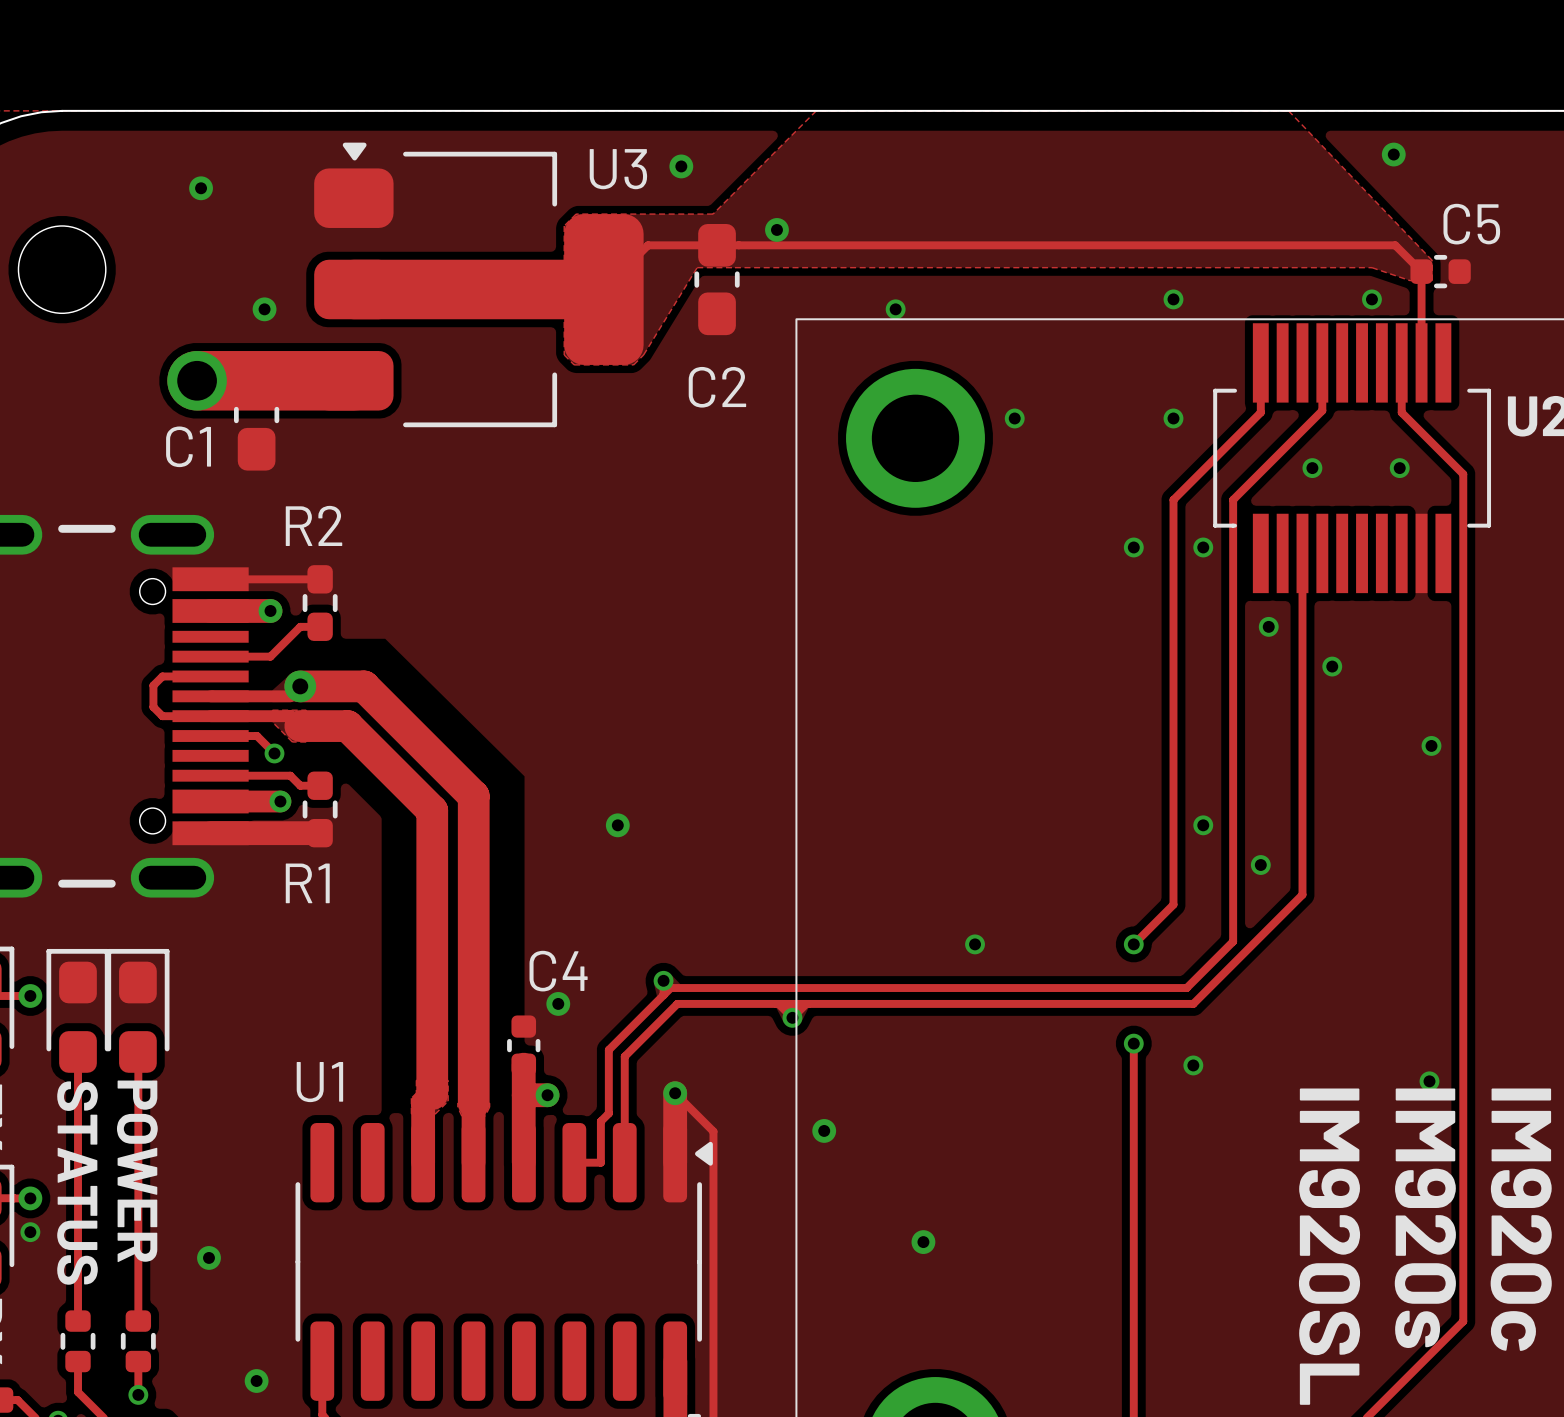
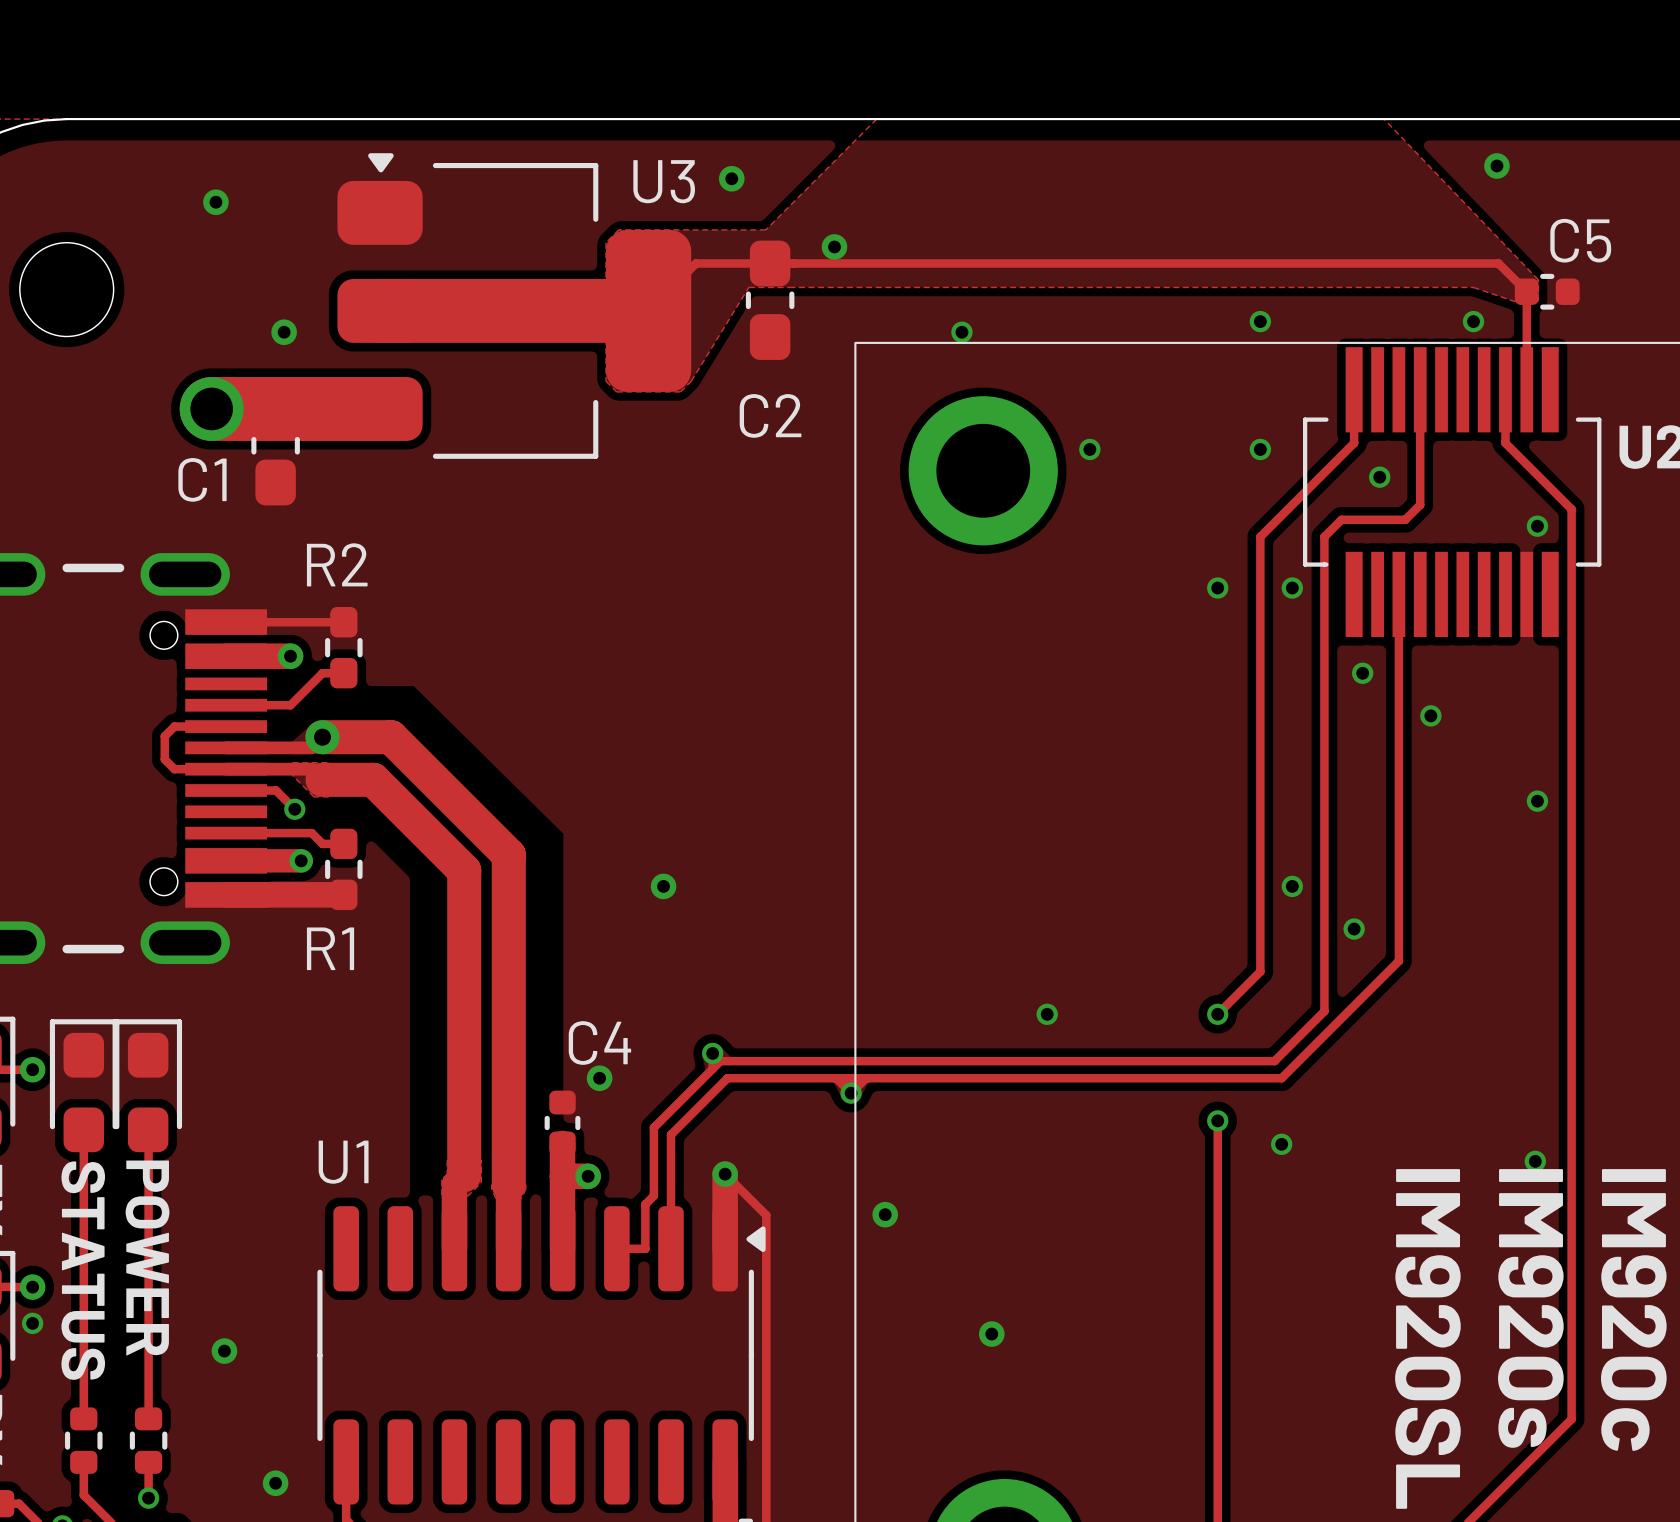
track: (1322, 410) (1249, 483) -> (1420, 441) (1420, 504) (1405, 519) (1341, 519)
via position: (1312, 468) -> (1379, 477)
via position: (1399, 468) -> (1537, 526)

